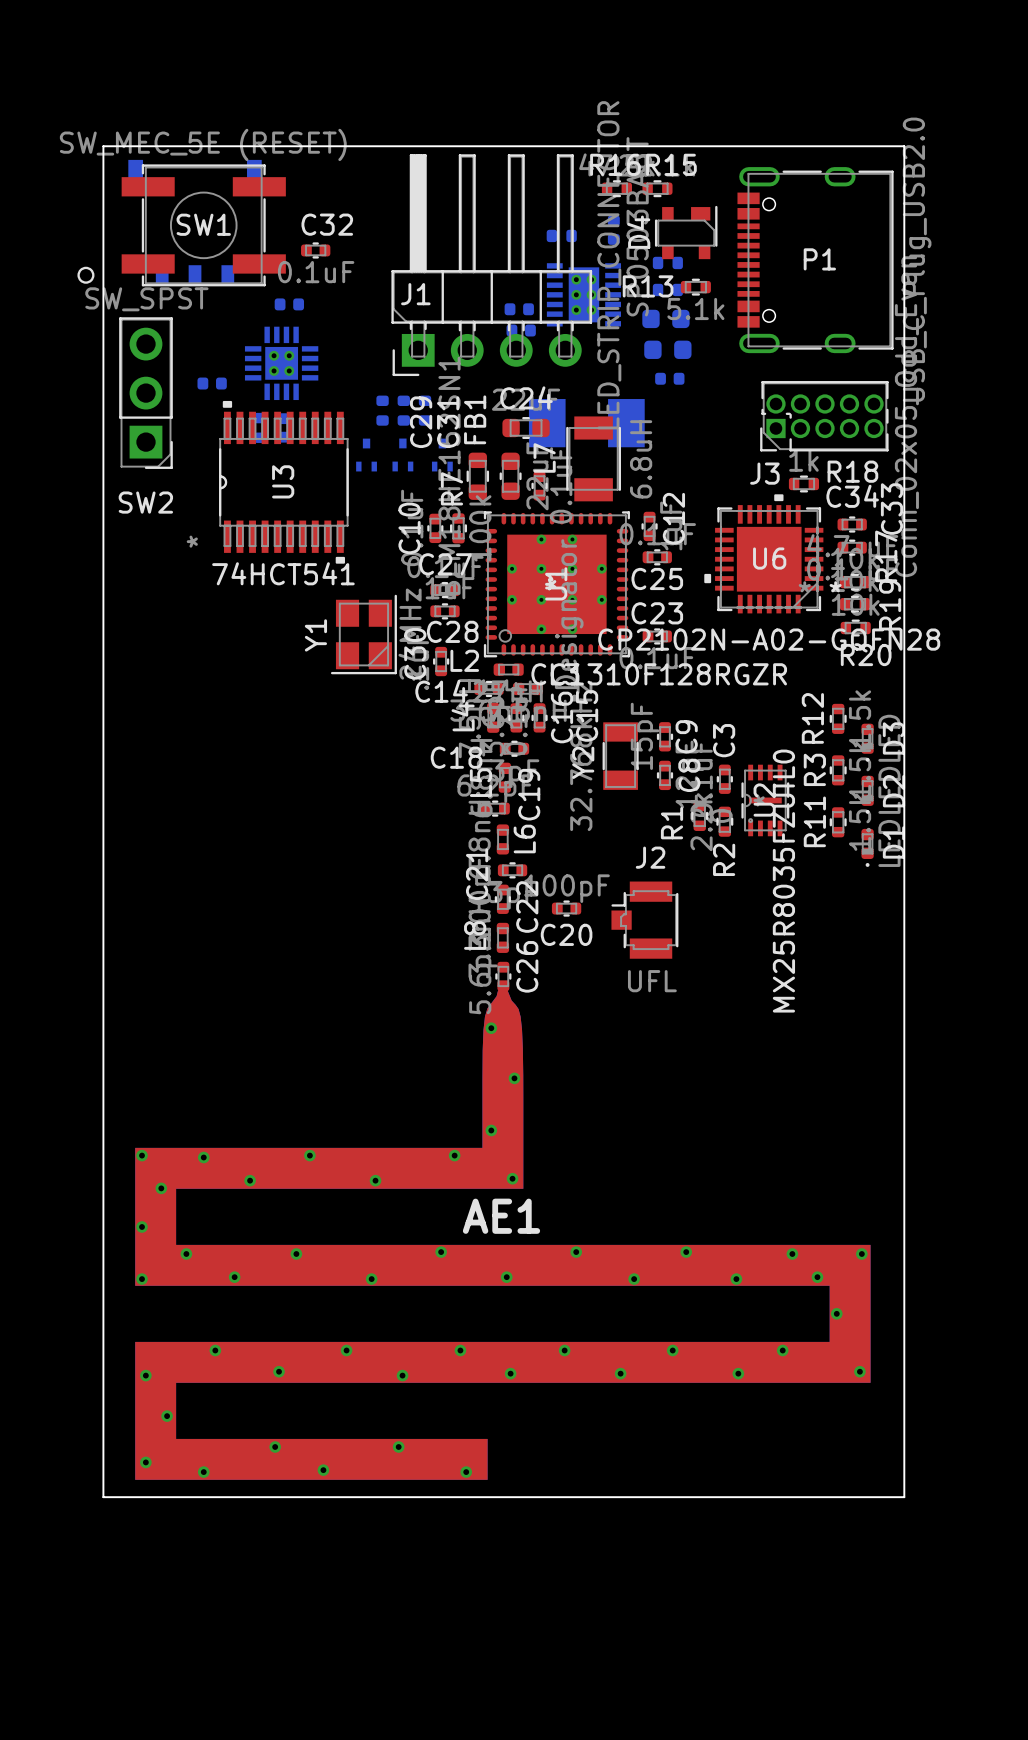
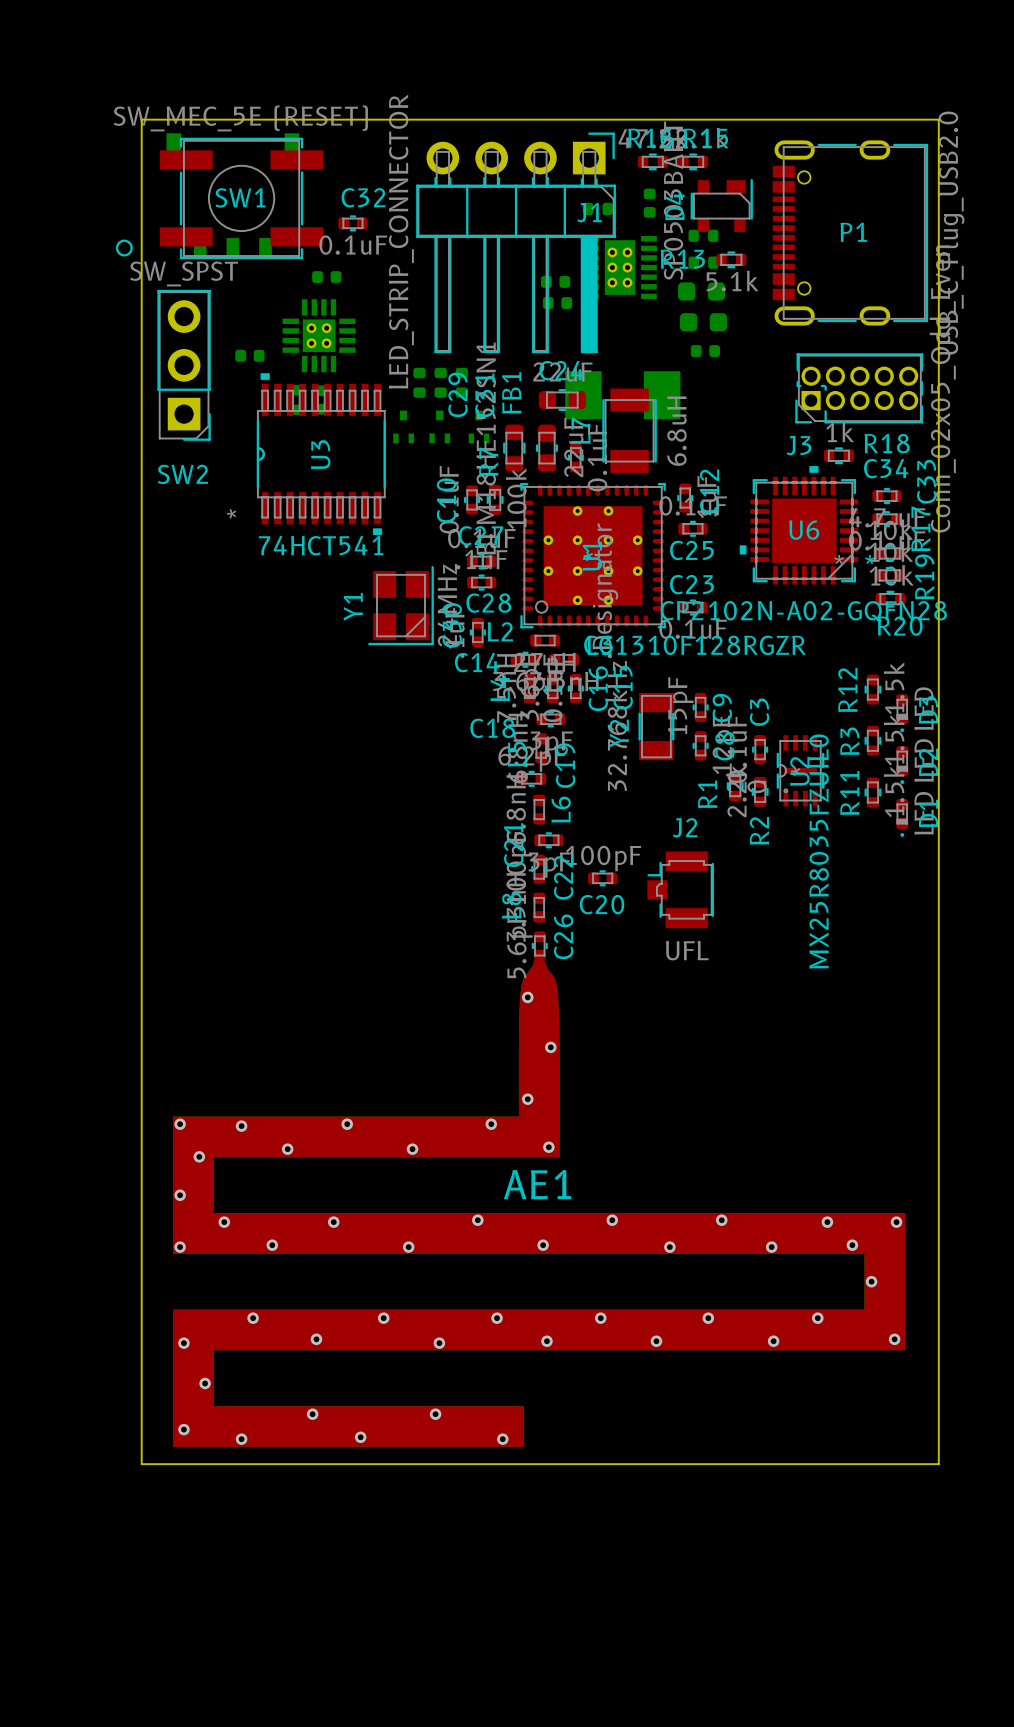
J1 rotation: 0° (491, 265) -> 180° (516, 242)

